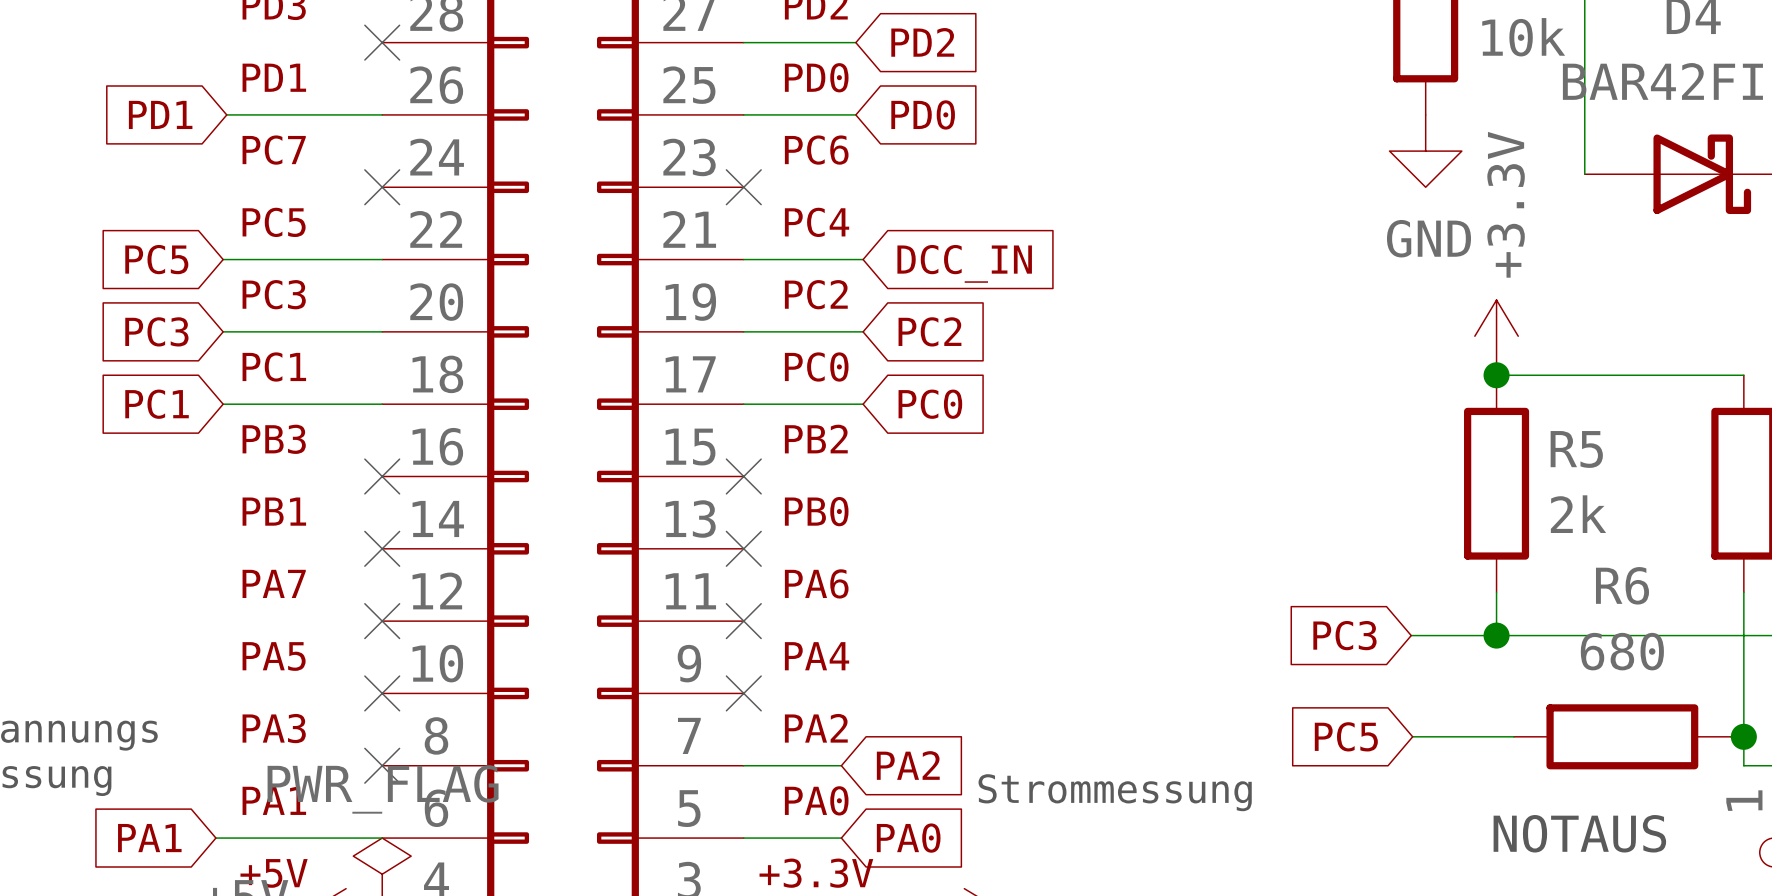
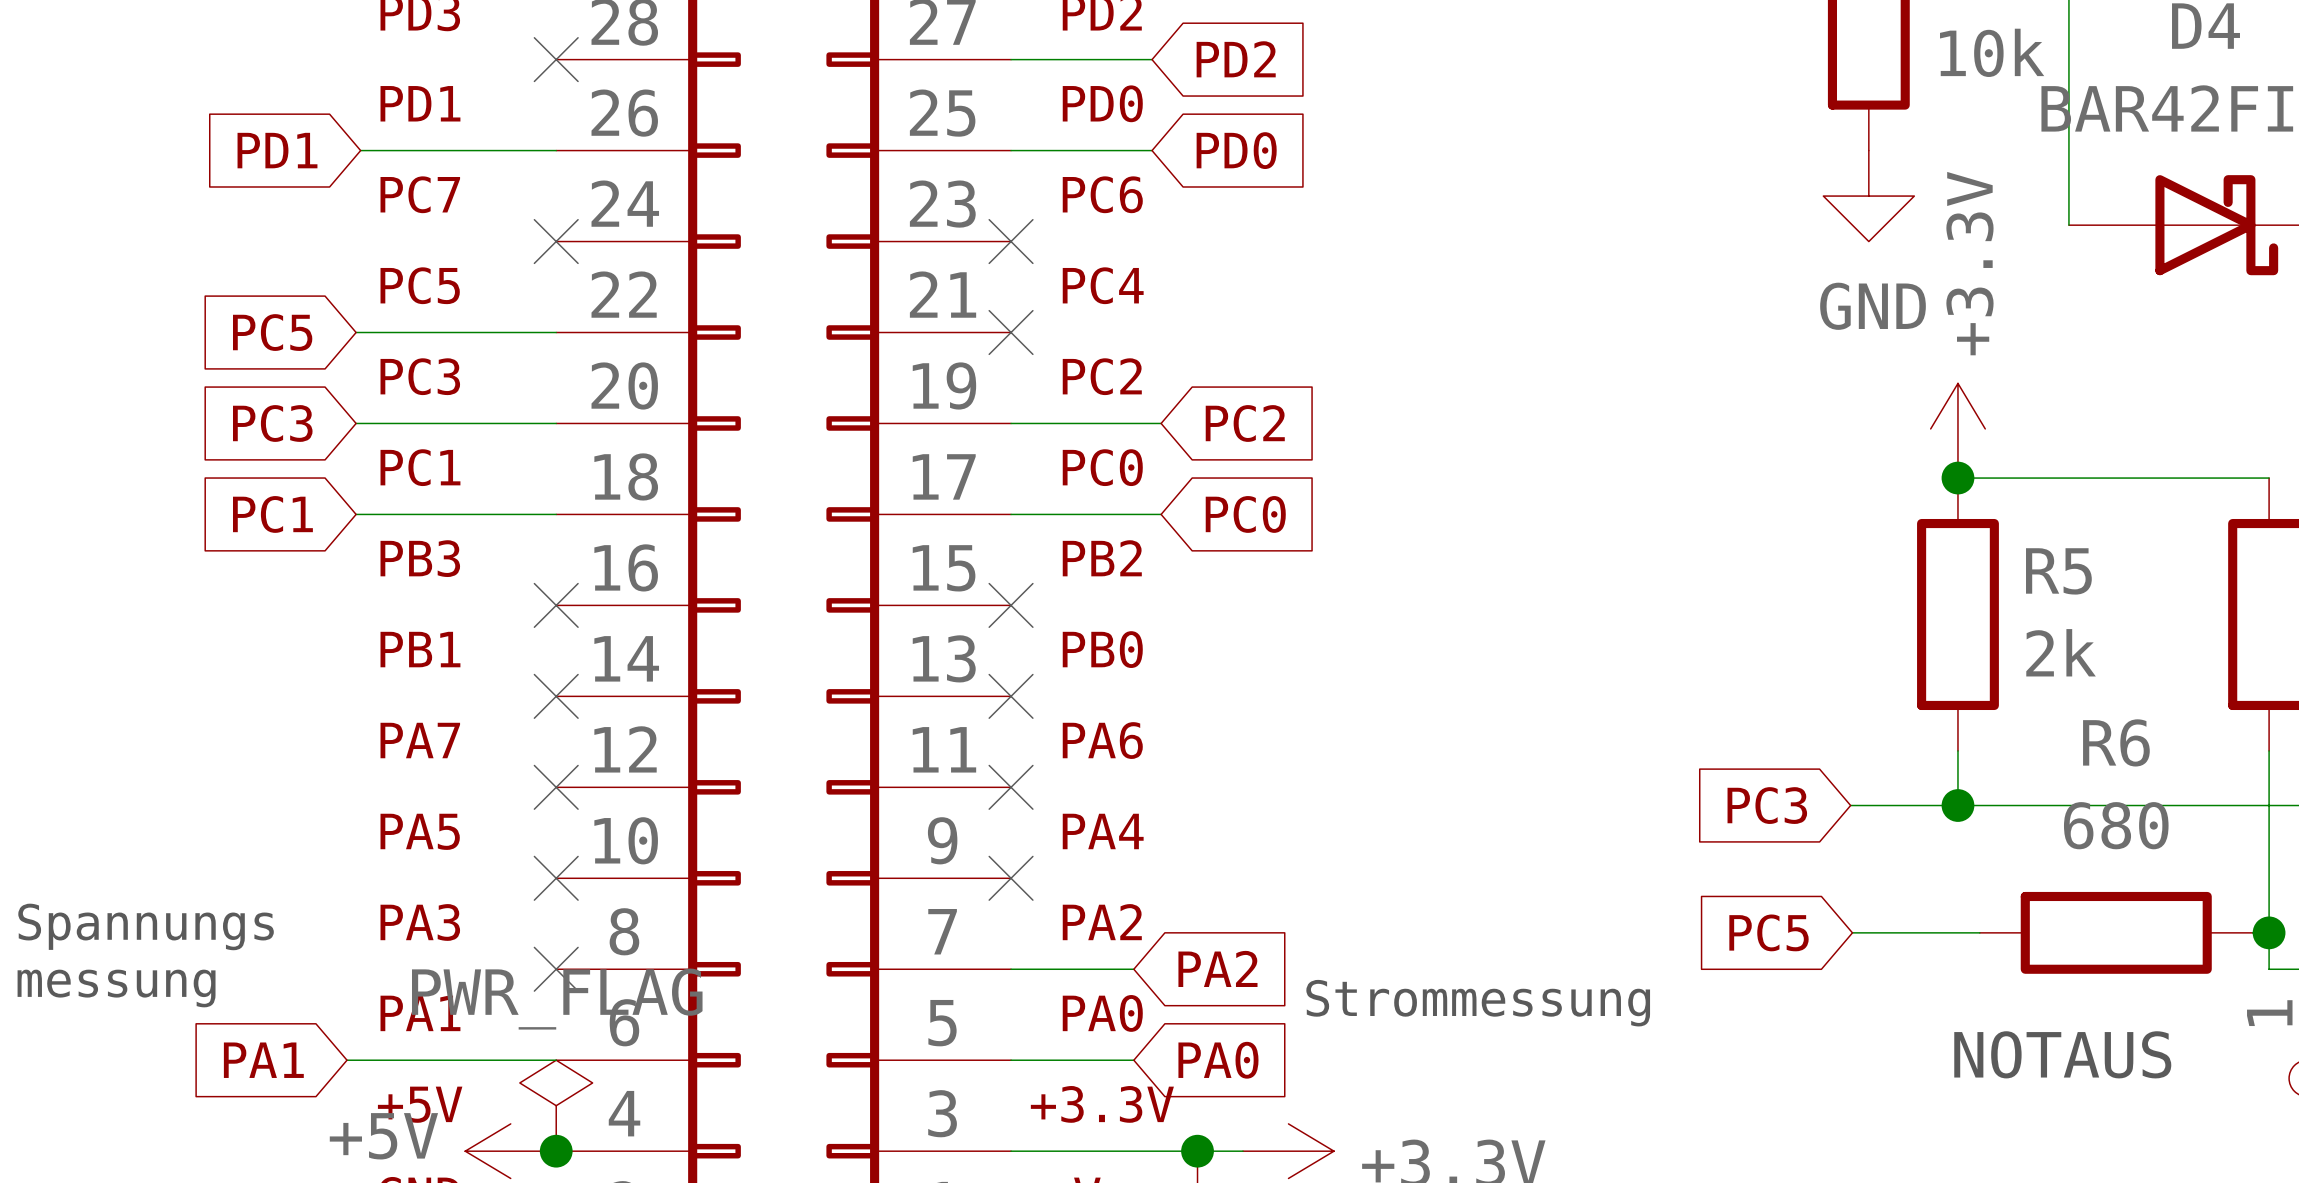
wire: (743, 259) (863, 259) -> none
no-connect mark: none -> (1011, 332)
global label: DCC_IN (964, 263) -> none

